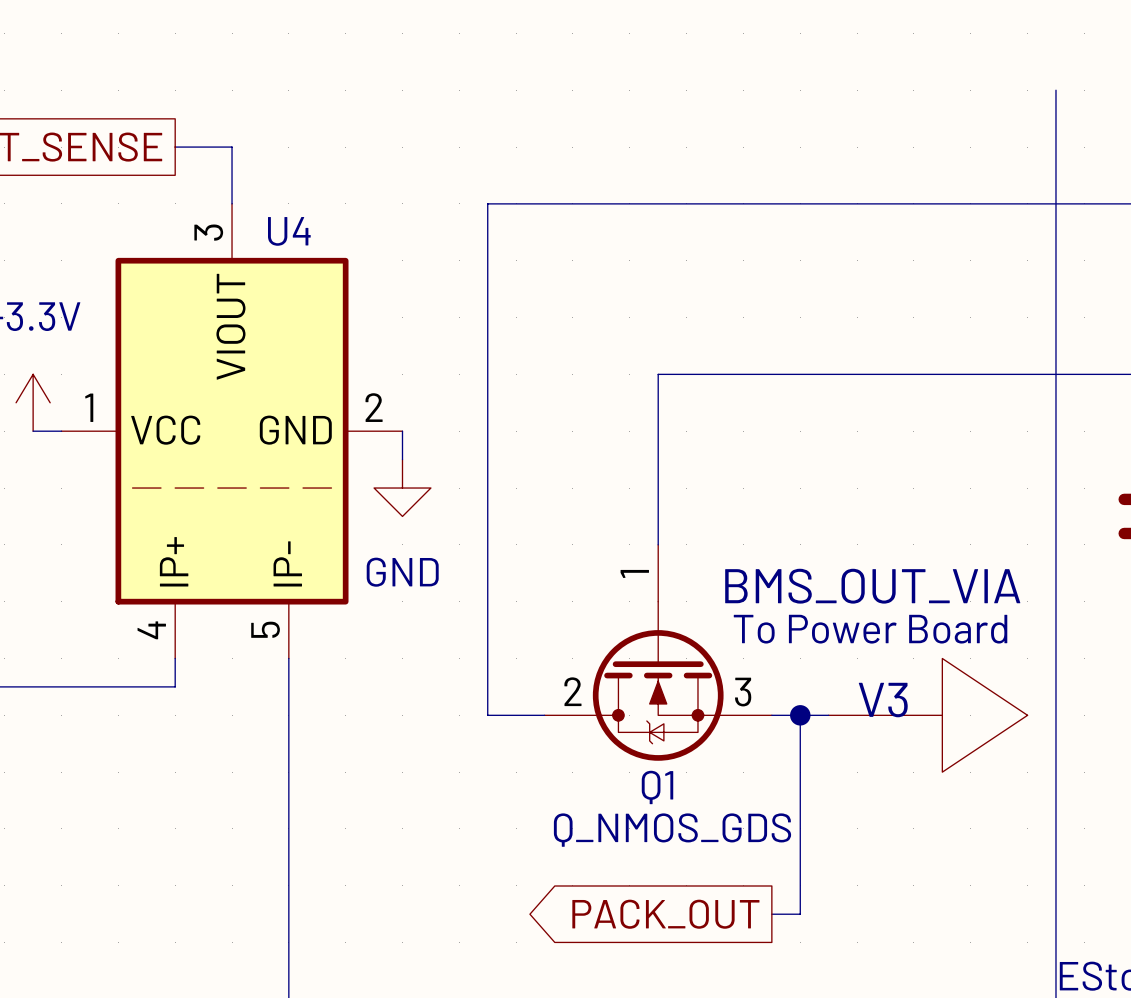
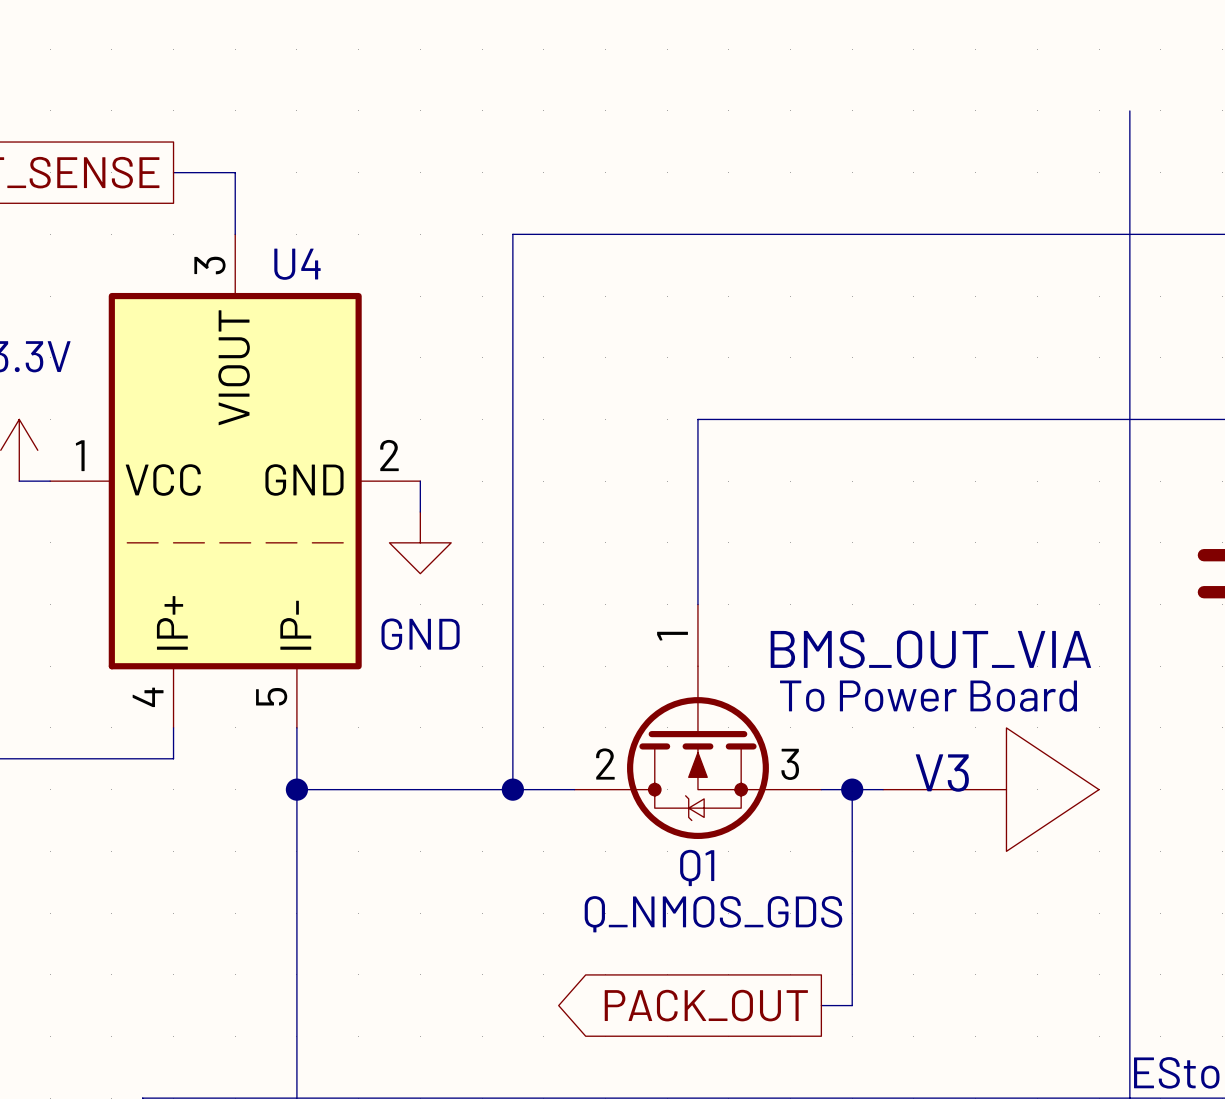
wire: none -> (296, 789) (512, 789)
junction: none -> (296, 789)
junction: none -> (512, 789)

